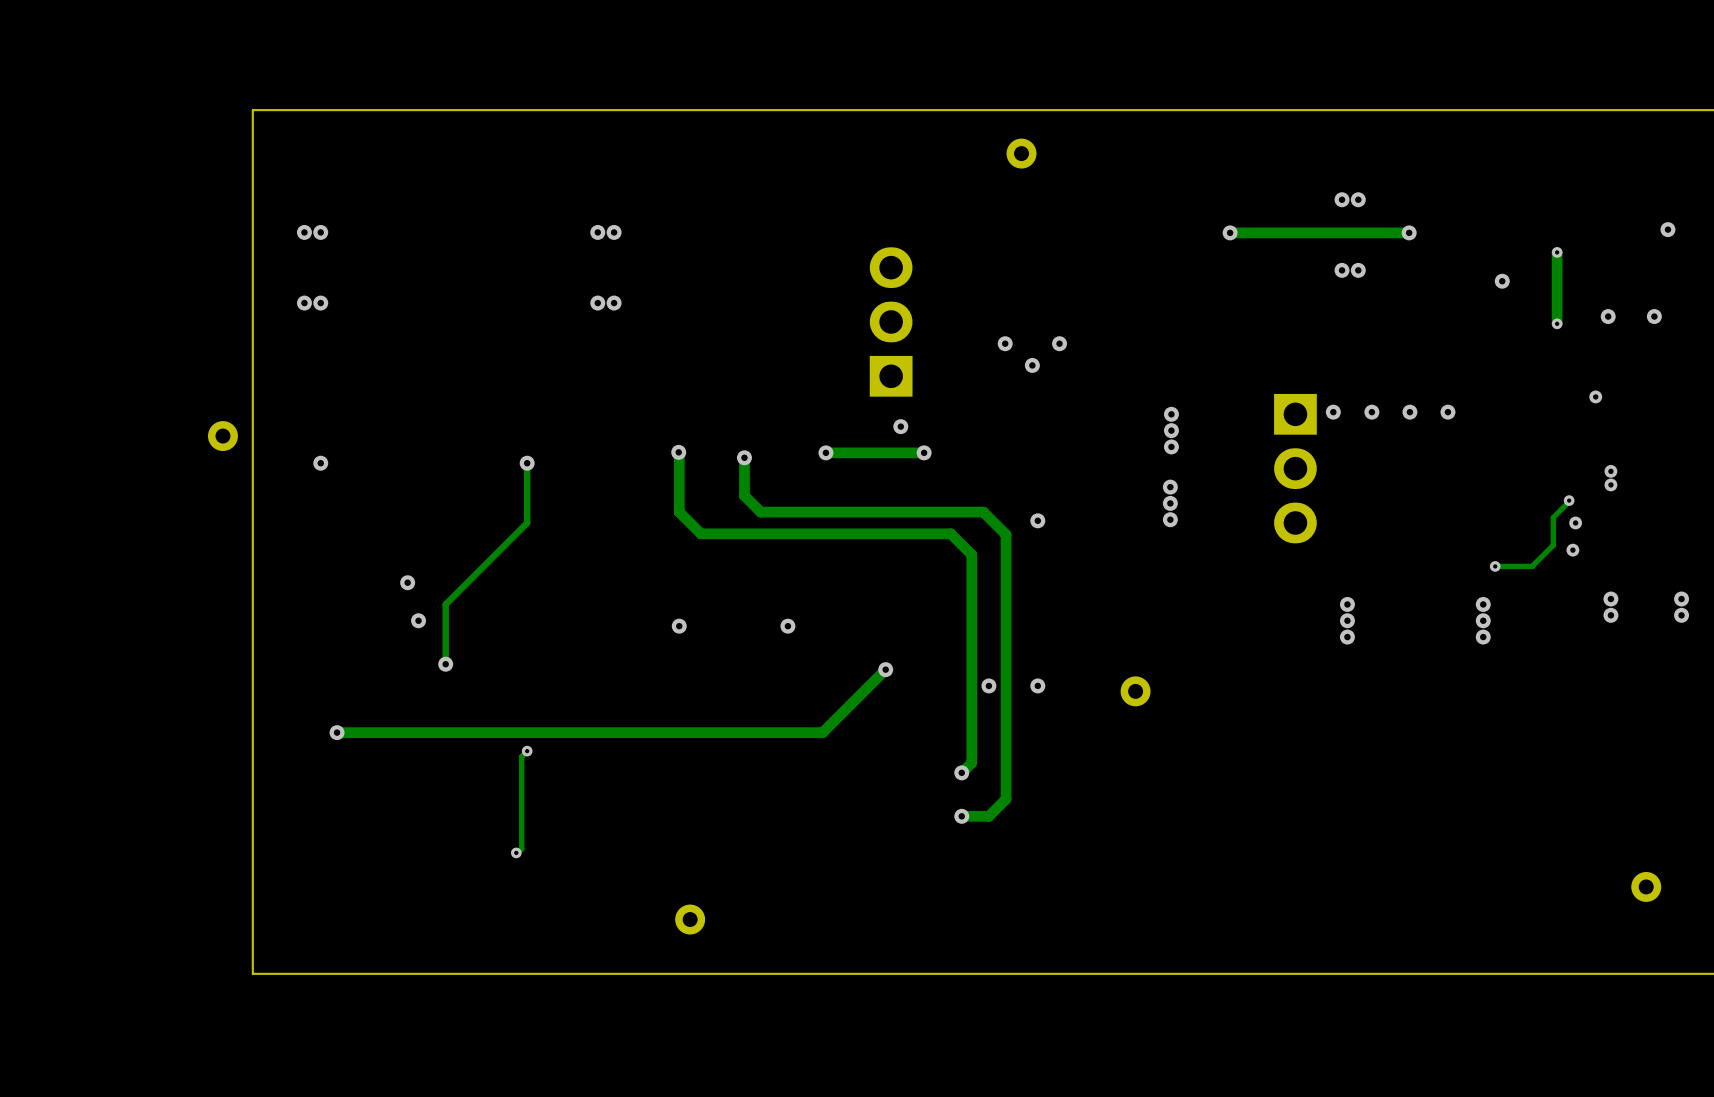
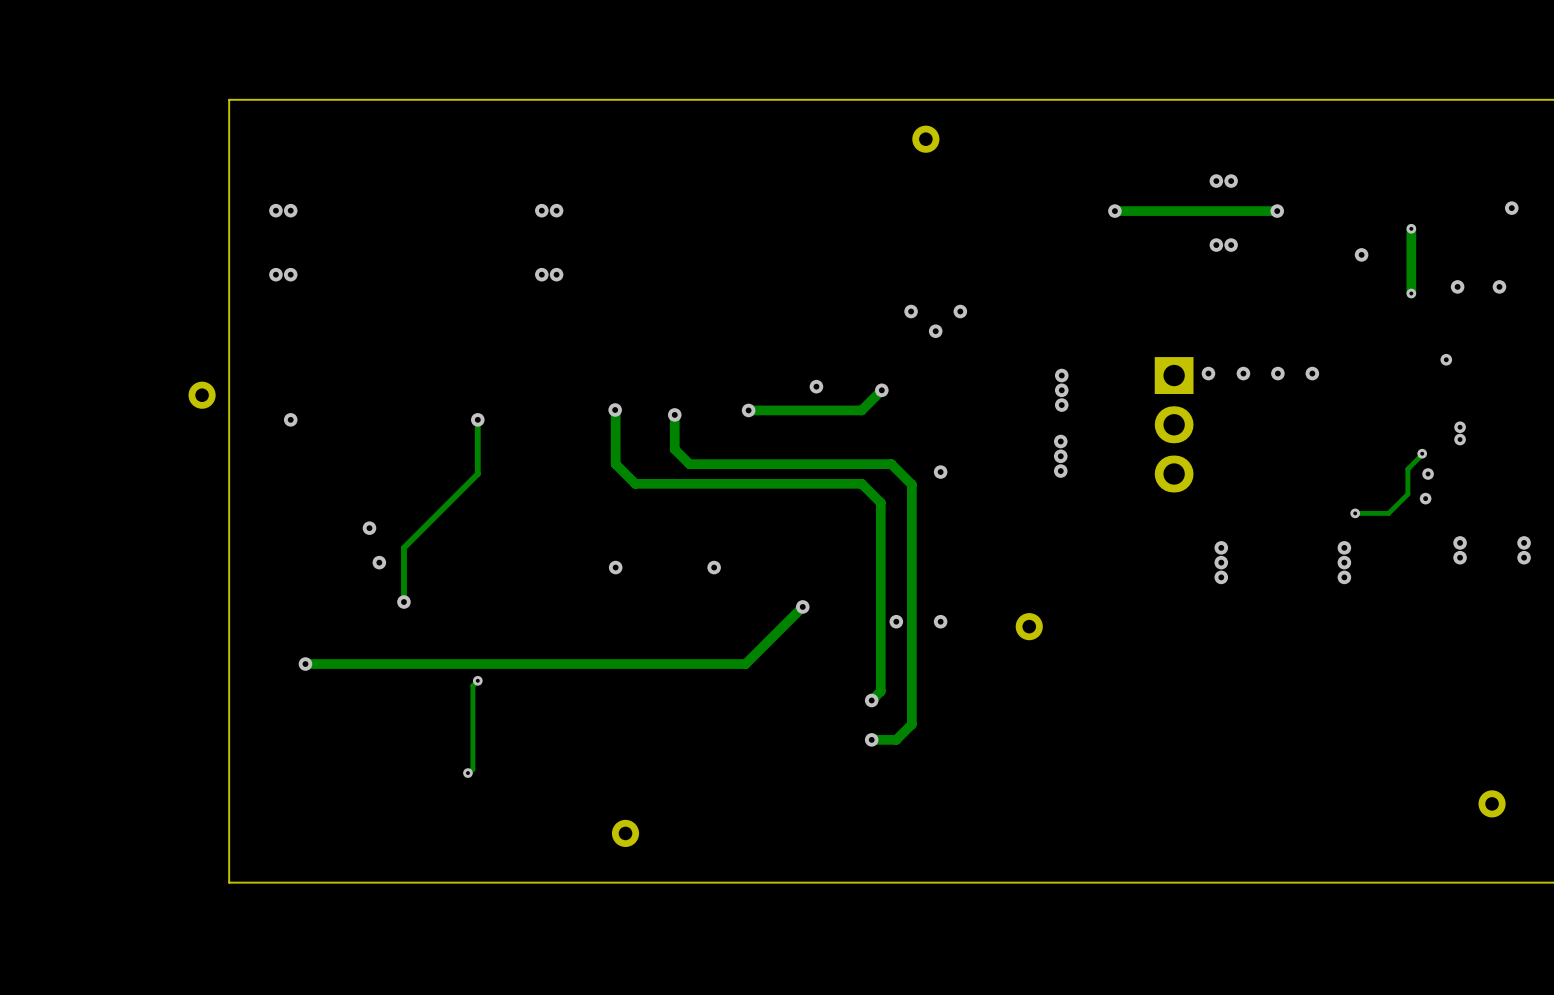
part: (891, 321) -> none
track: none -> (881, 390) (861, 410) (837, 410)
via position: (924, 452) -> (881, 390)

